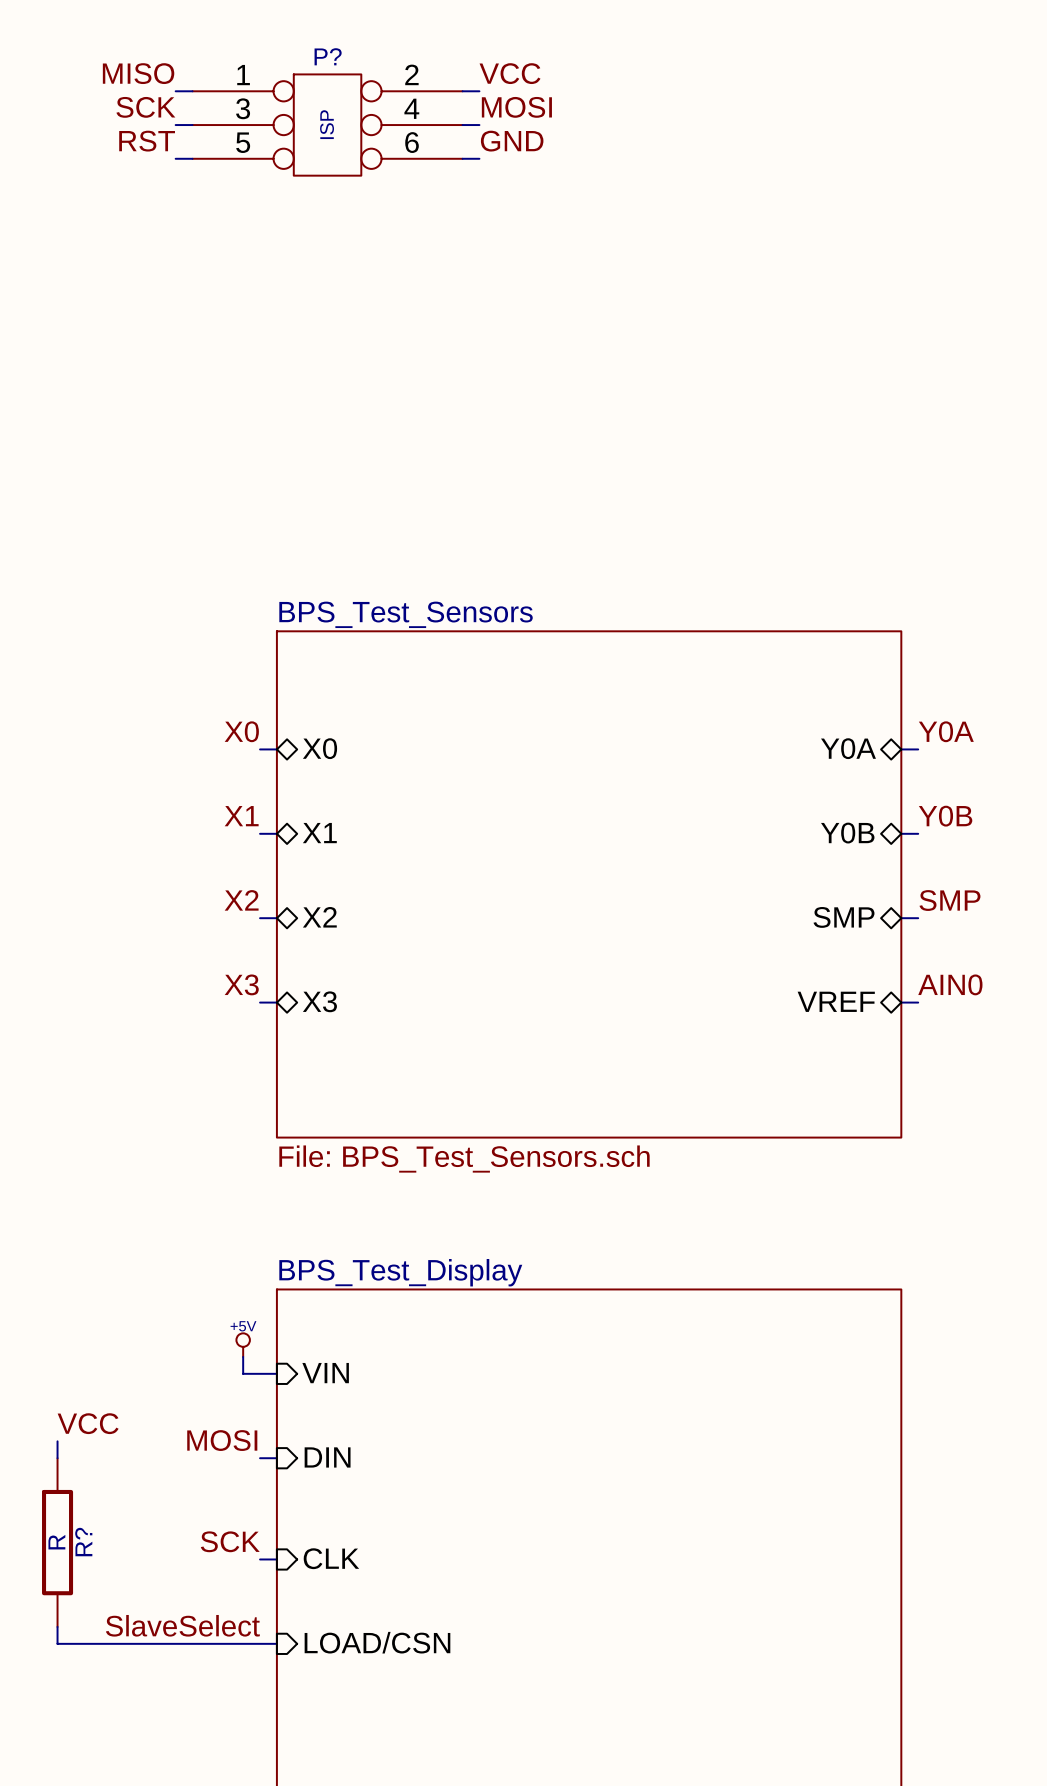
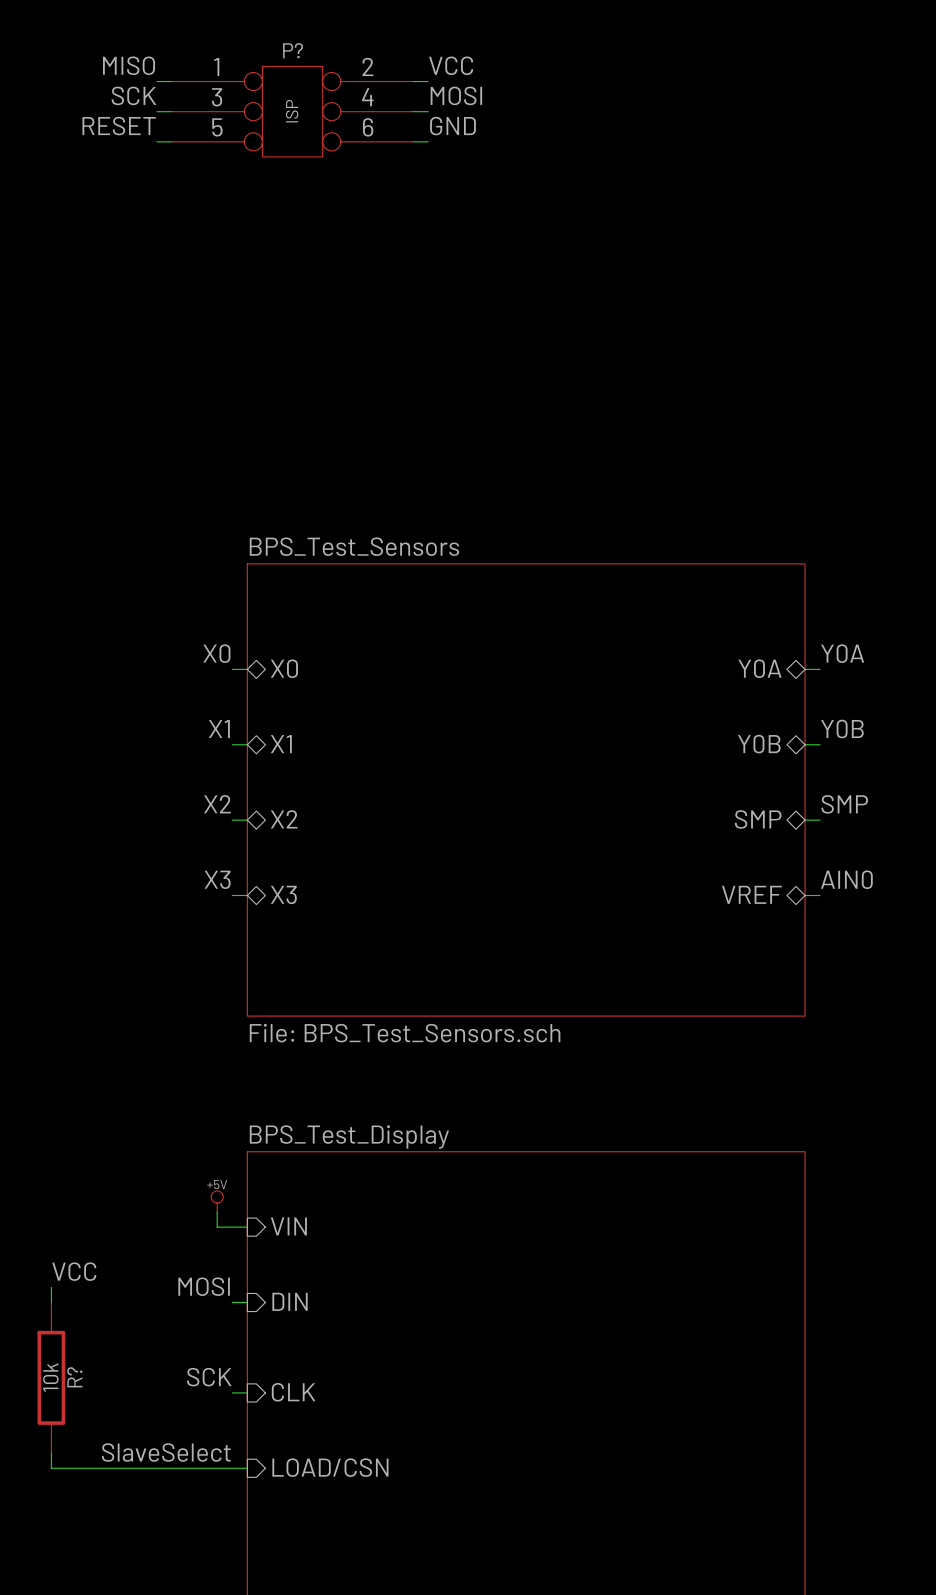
label: RST (147, 141) -> RESET (119, 126)
R? value: R (56, 1542) -> 10k (50, 1377)

